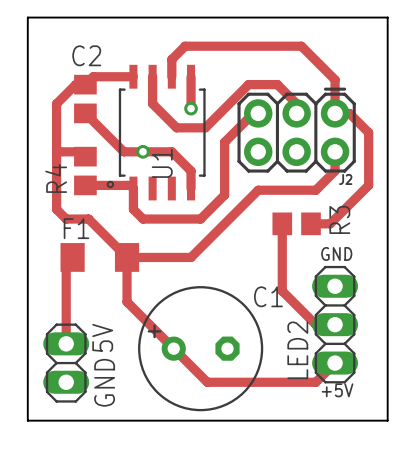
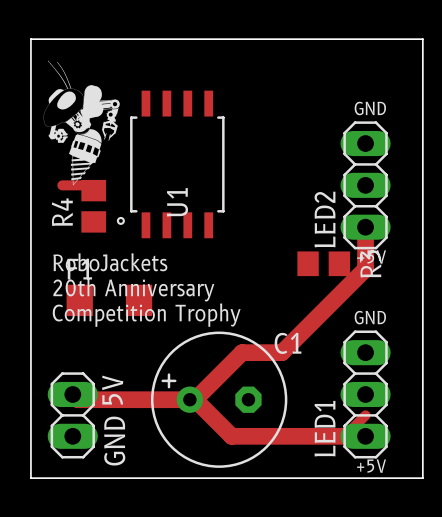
drawing: none -> [43, 60, 120, 186]
track: (133, 76) (93, 76) (85, 84) (75, 84) (56, 103) (56, 209) (66, 219) (88, 219) (127, 257) -> none
track: (152, 76) (152, 103) (176, 127) (205, 127) (248, 84) (277, 84) (296, 103) (296, 113) -> none
track: (171, 76) (171, 59) (185, 46) (301, 46) (335, 79) (335, 113) (349, 113) (368, 132) (368, 185) (330, 223) (311, 223) -> none
track: (191, 76) (191, 108) -> none
C2: (85, 99) -> none
via: (191, 108) -> none
track: (85, 113) (123, 151) (171, 151) (191, 171) (191, 188) -> none
track: (258, 113) (253, 113) (224, 142) (224, 195) (200, 219) (143, 219) (133, 209) (133, 188) (130, 185) (85, 185) -> none
J2: (296, 130) -> none
via: (143, 151) -> none
track: (335, 151) (335, 171) (315, 190) (258, 190) (191, 257) (127, 257) -> none
track: none -> (365, 227) (365, 269) (281, 352) (242, 352) (195, 399)
text: none -> RoboJackets (110, 262)
track: (282, 223) (282, 291) (315, 324) (335, 324) -> none
text: none -> 20th Anniversary (133, 289)
track: (72, 257) (66, 263) (66, 343) -> (195, 399) (78, 399) (72, 394)
track: (127, 257) (127, 301) (207, 382) (212, 382) -> (195, 399) (231, 436)
text: none -> Competition Trophy (146, 315)
LED2 position: (335, 324) -> (365, 185)
LED1: none -> (365, 394)
track width: thin (212, 382) (315, 382) -> thick (231, 436) (344, 436)

